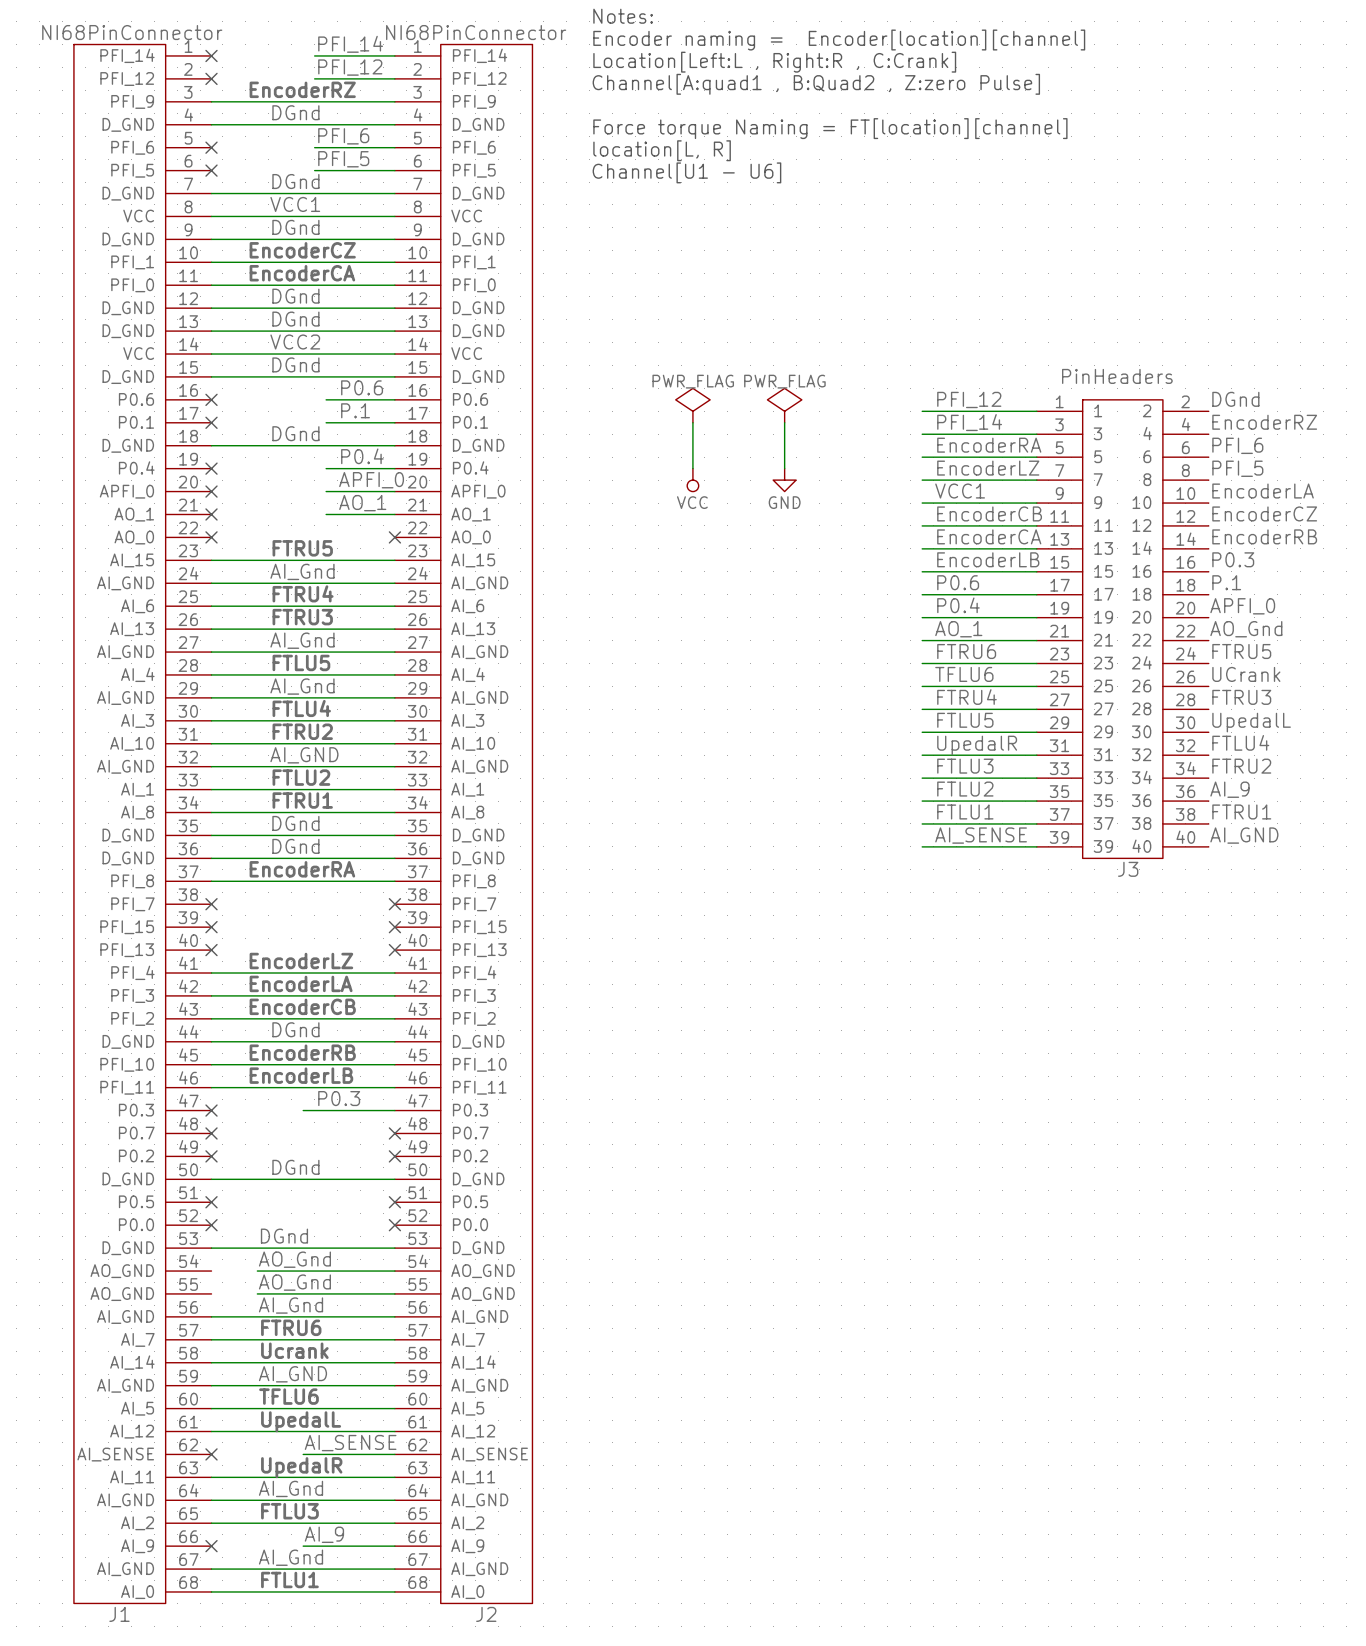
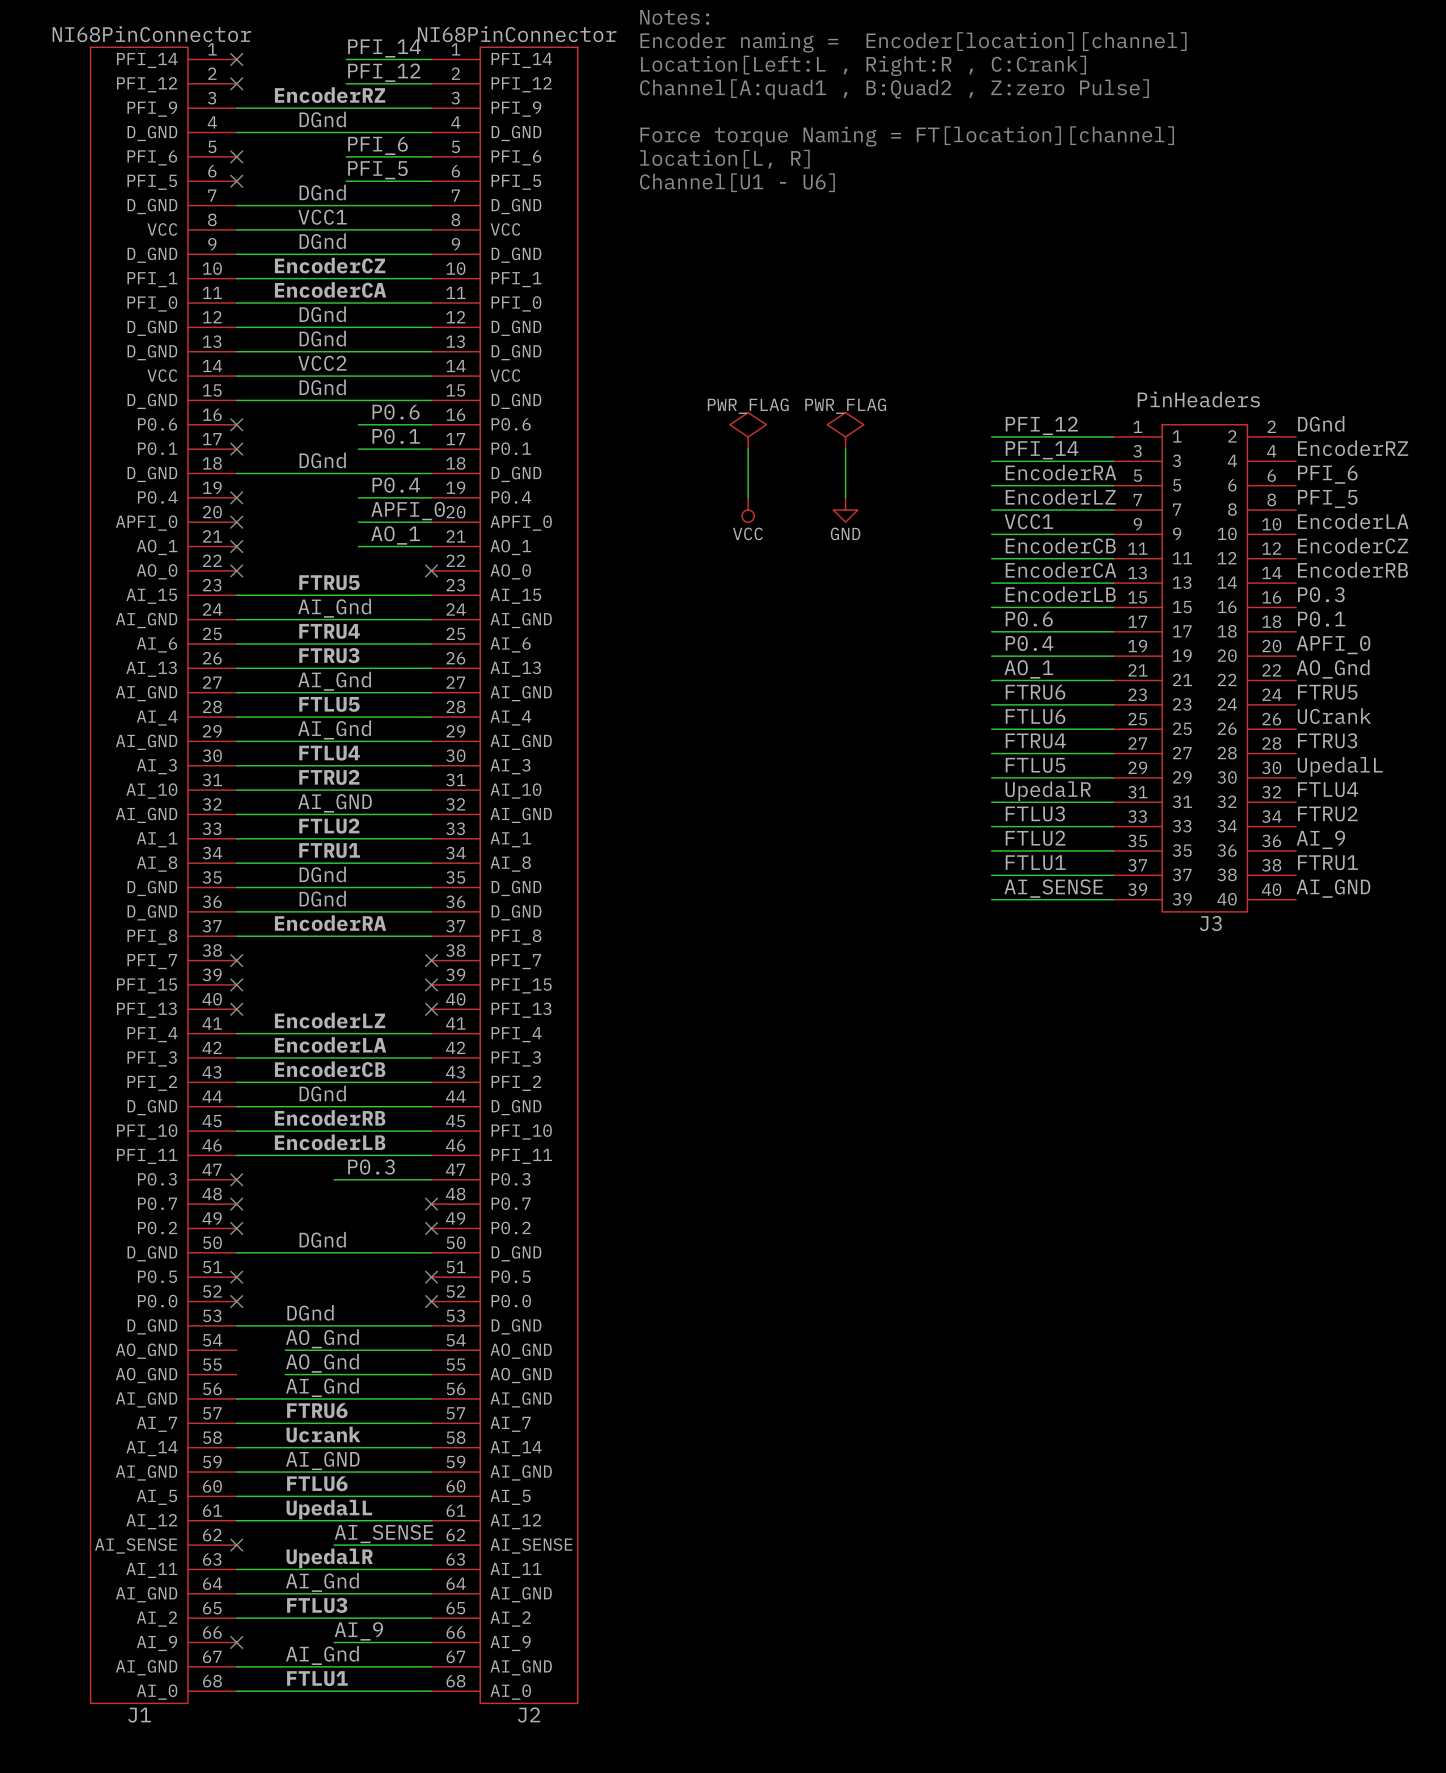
label: P.1 (355, 410) -> P0.1 (396, 436)
label: P.1 (1226, 582) -> P0.1 (1321, 619)
label: TFLU6 (964, 674) -> FTLU6 (1035, 716)
label: TFLU6 (288, 1396) -> FTLU6 (317, 1483)

